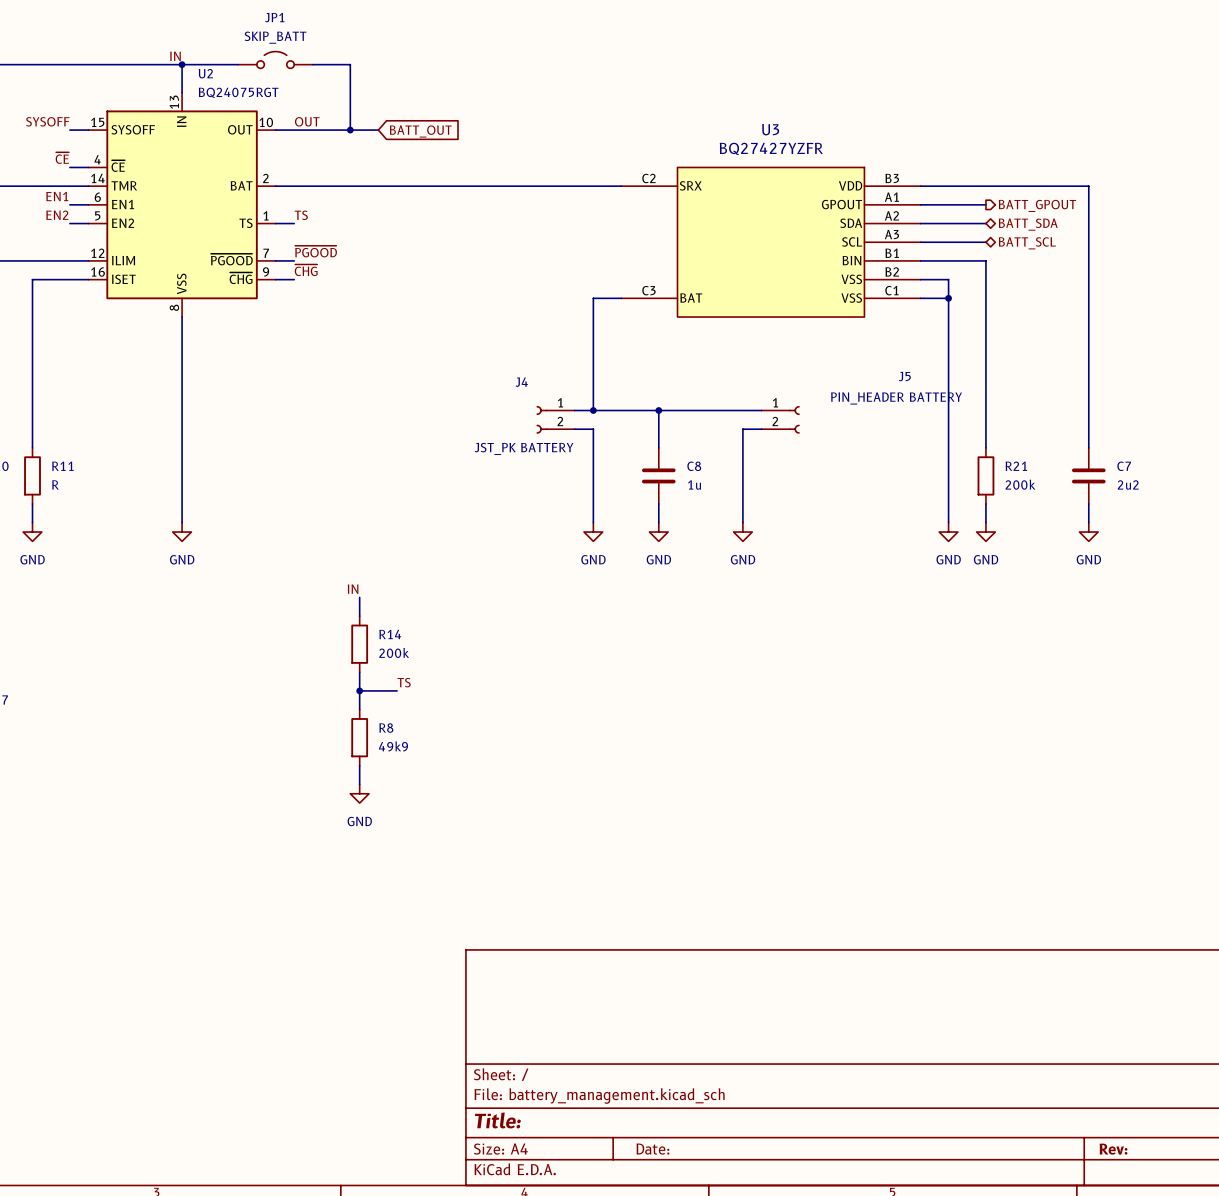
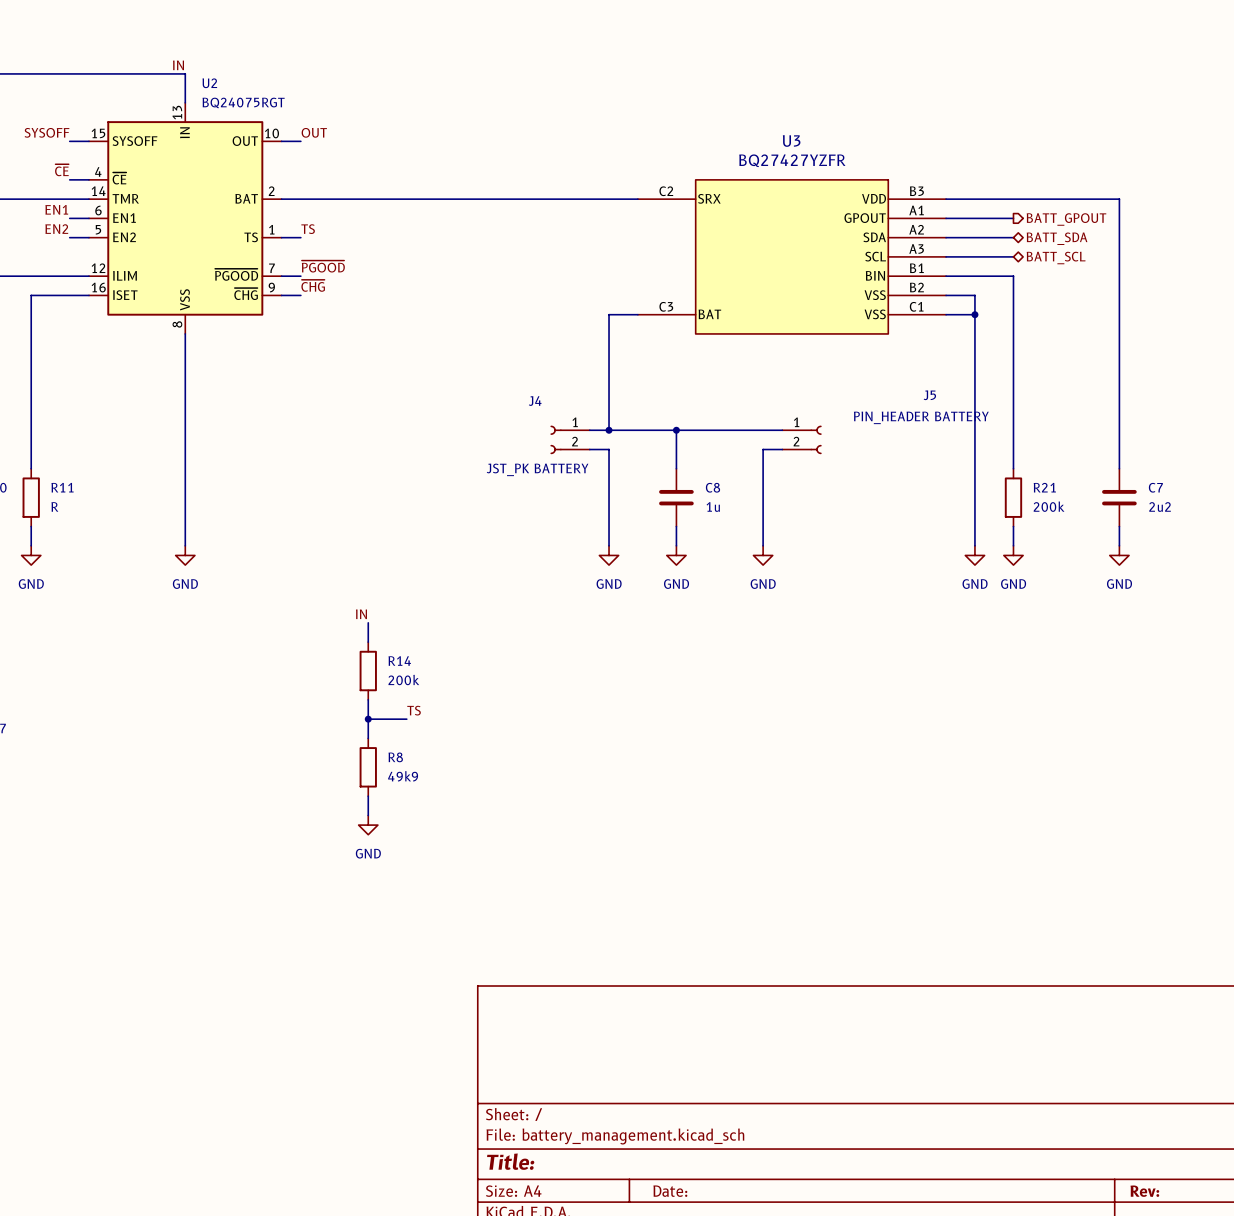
JP1: SKIP_BATT (275, 59) -> none
wire: (182, 64) (238, 64) -> none
junction: (182, 64) -> none
wire: (312, 64) (350, 64) (350, 130) -> none
wire: (294, 130) (378, 130) -> none
junction: (350, 130) -> none
global label: BATT_OUT (420, 131) -> none

